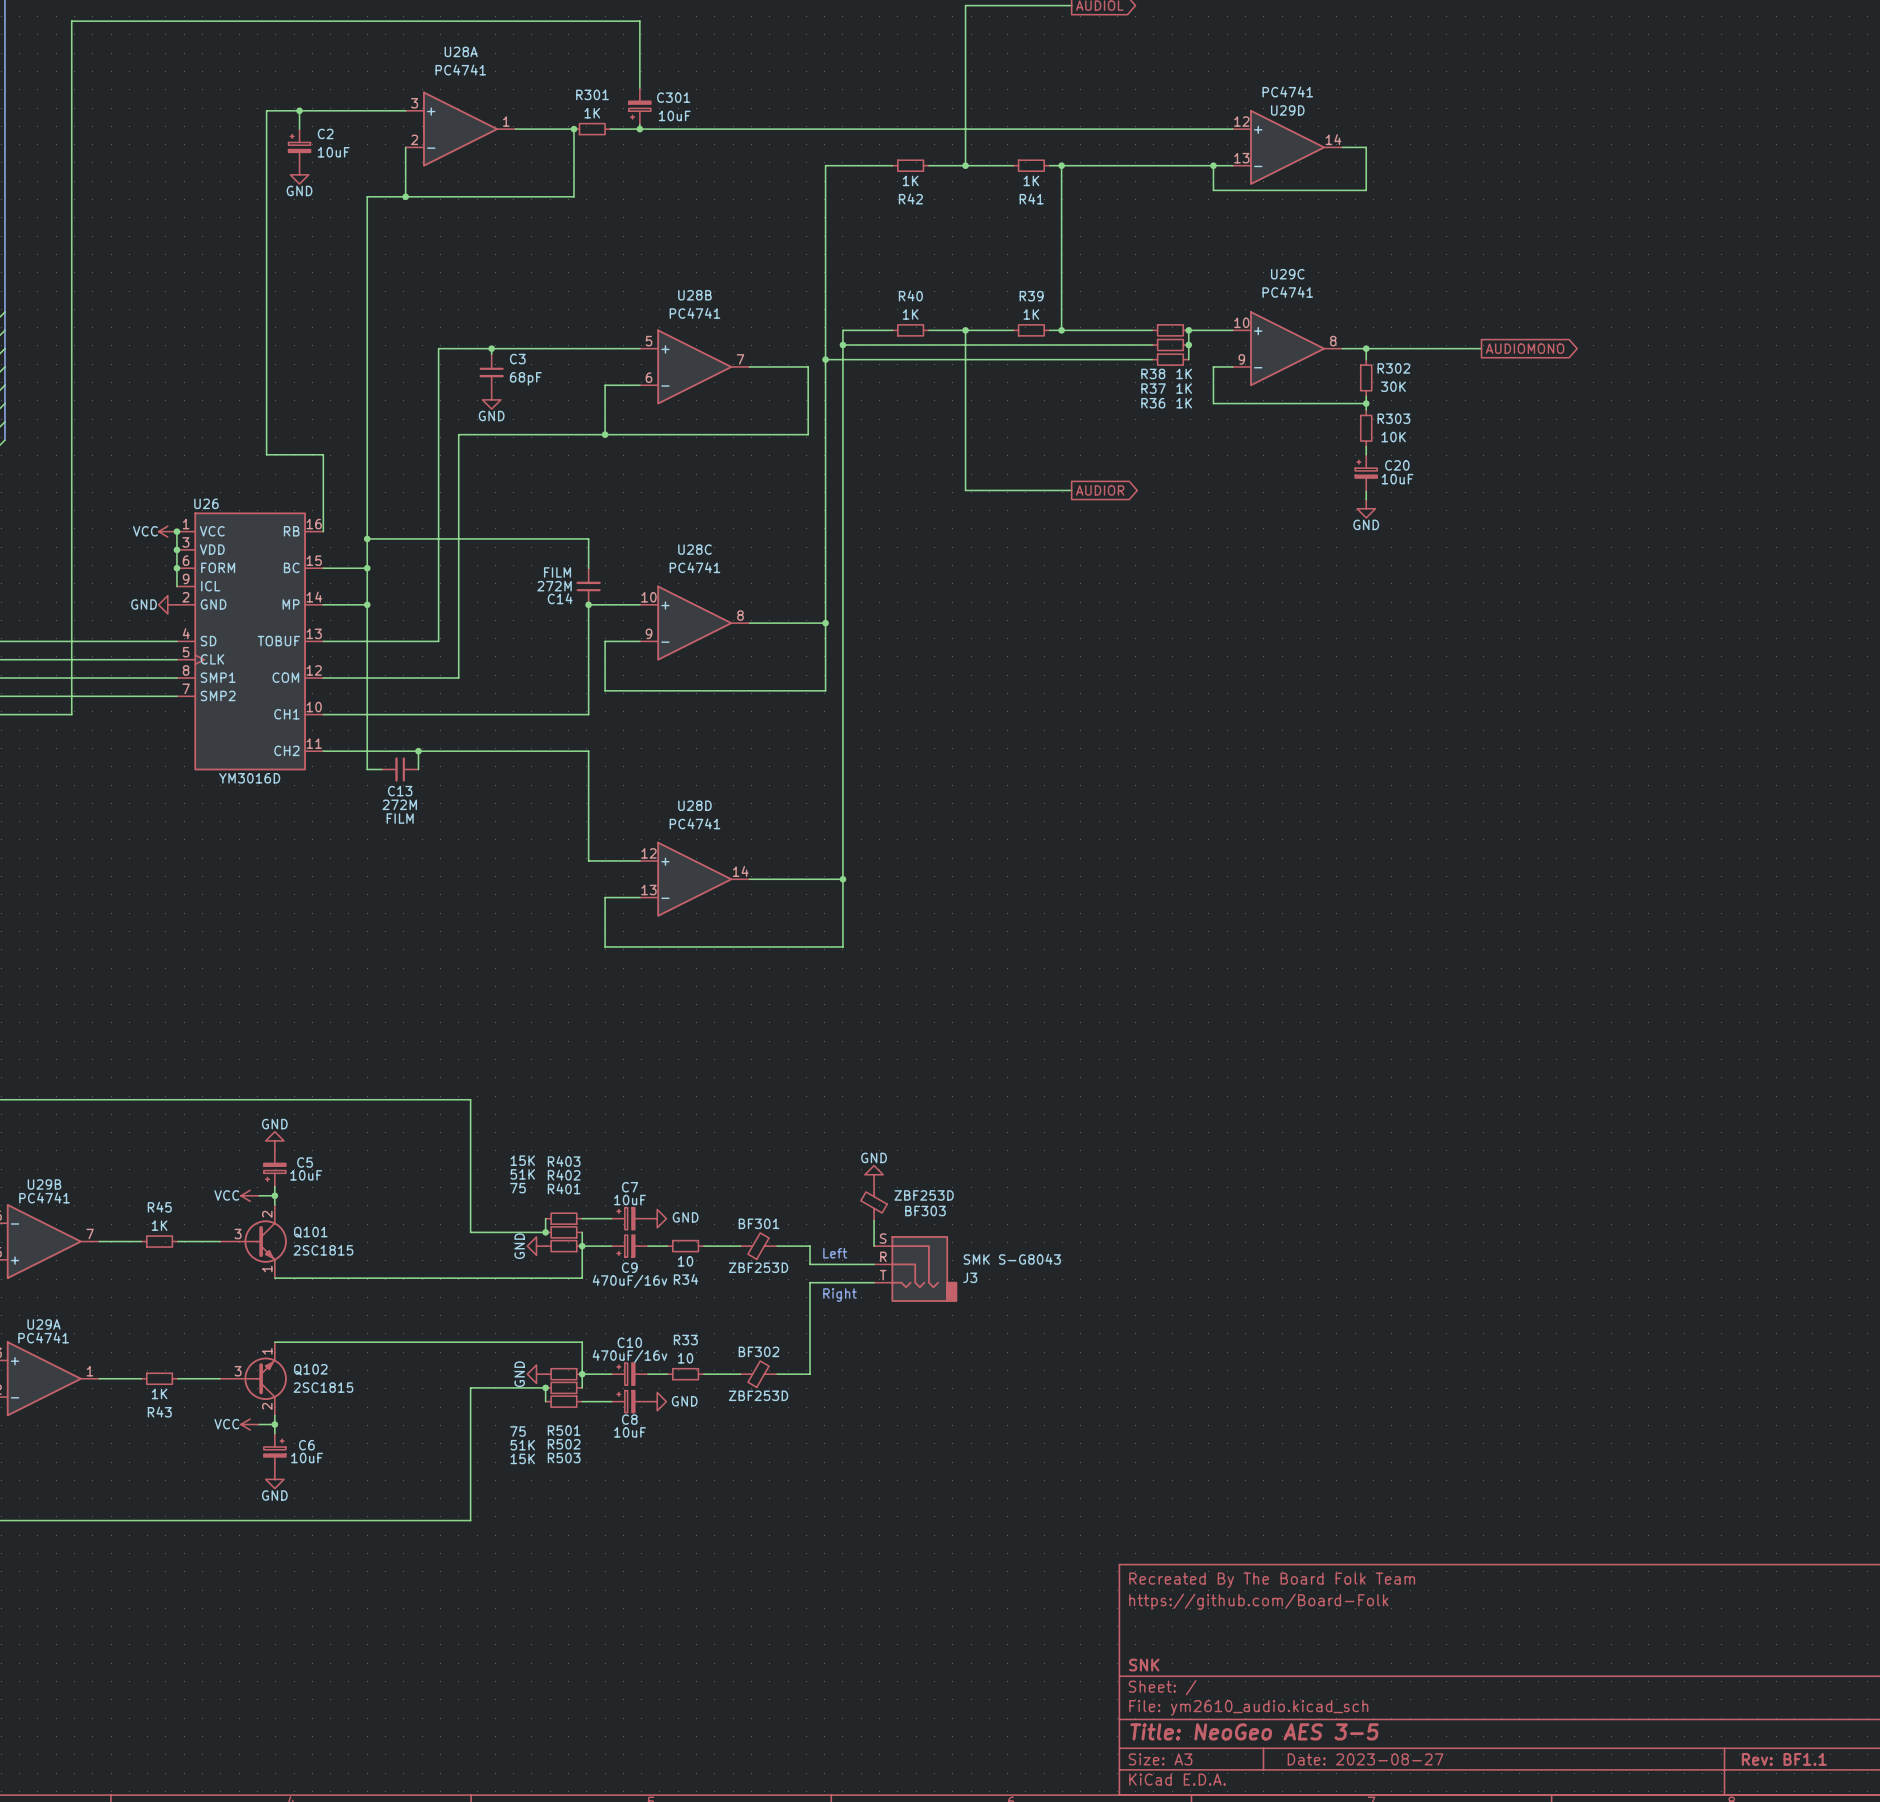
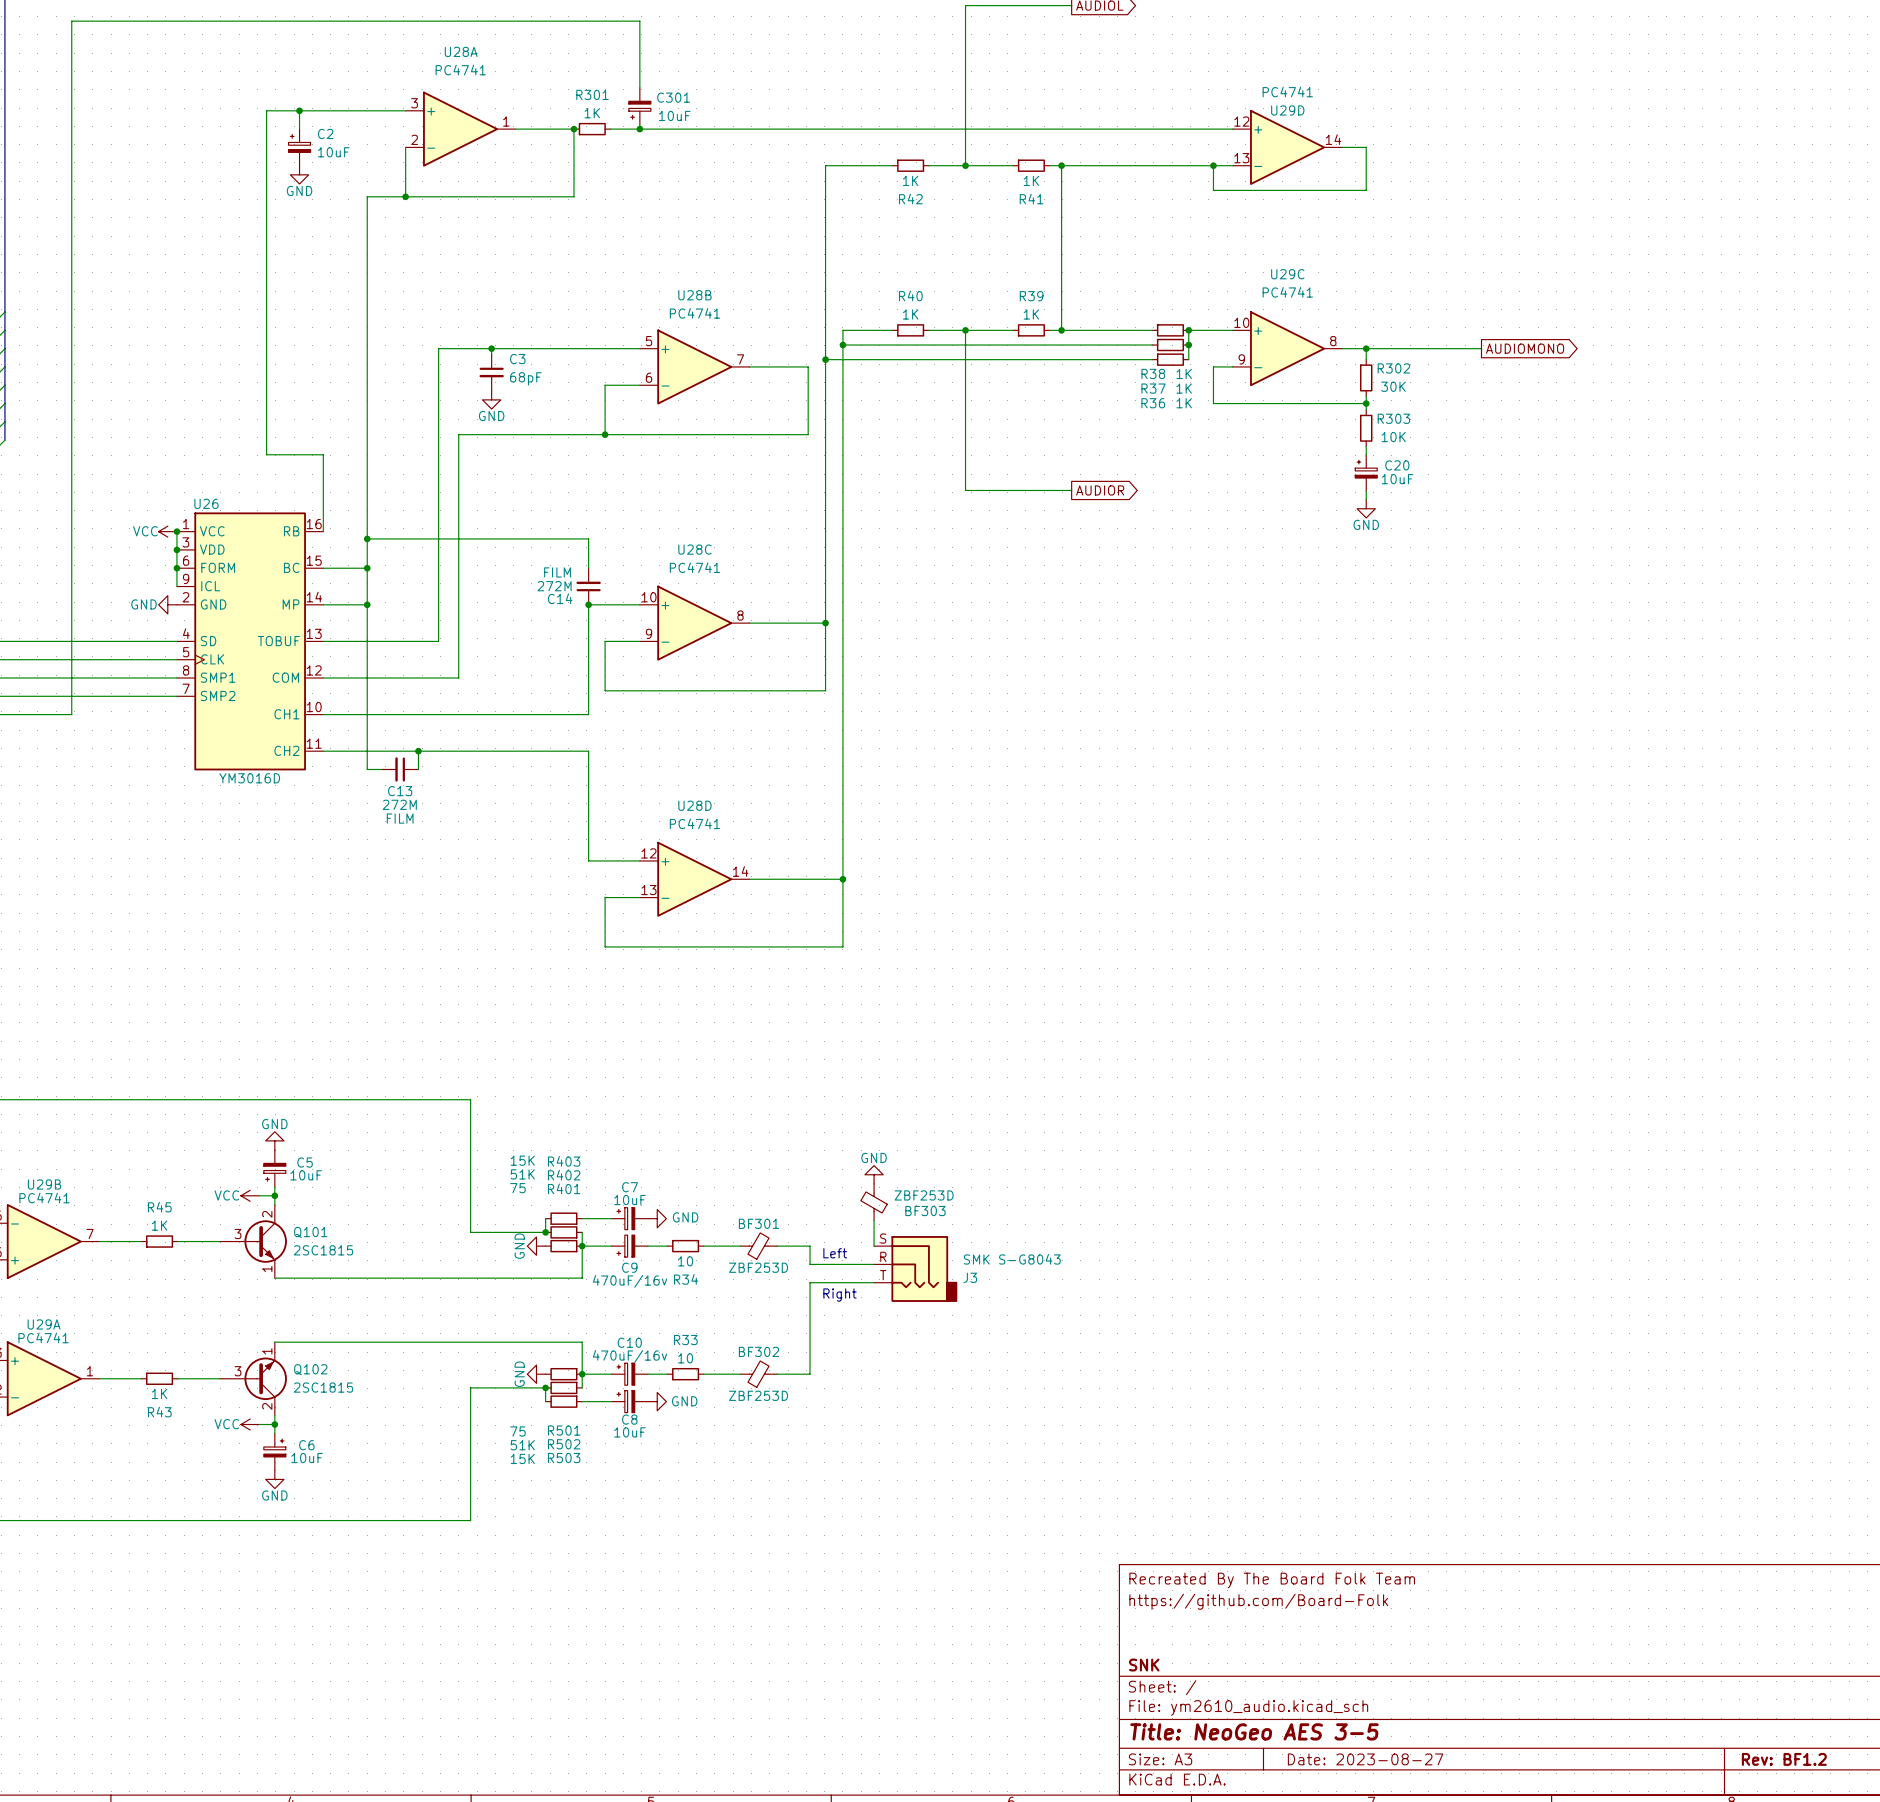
title block: Rev: BF1.1 (1784, 1759) -> Rev: BF1.2 (1784, 1759)

